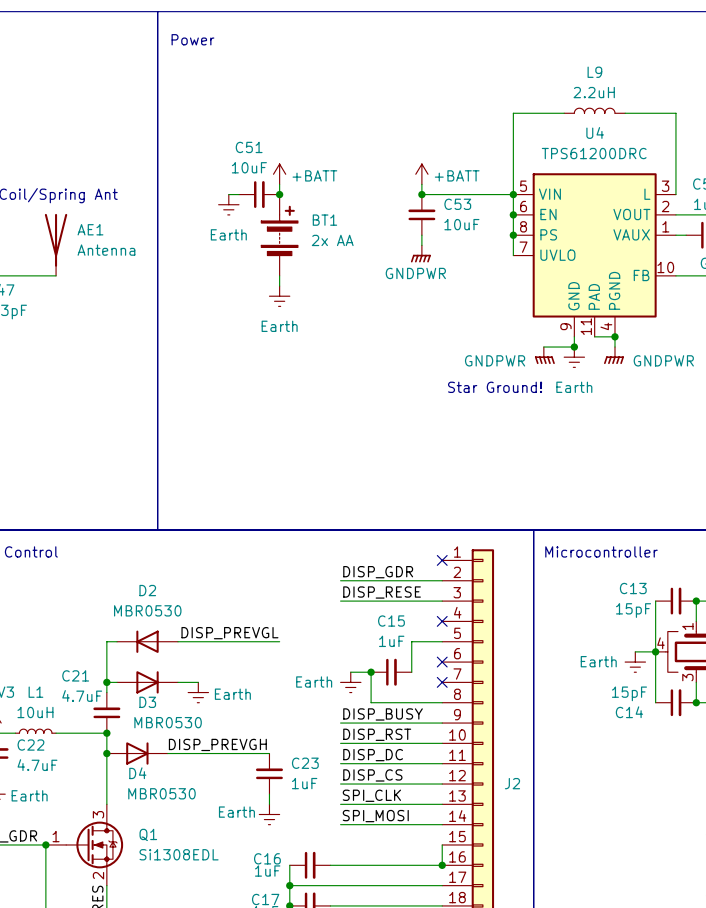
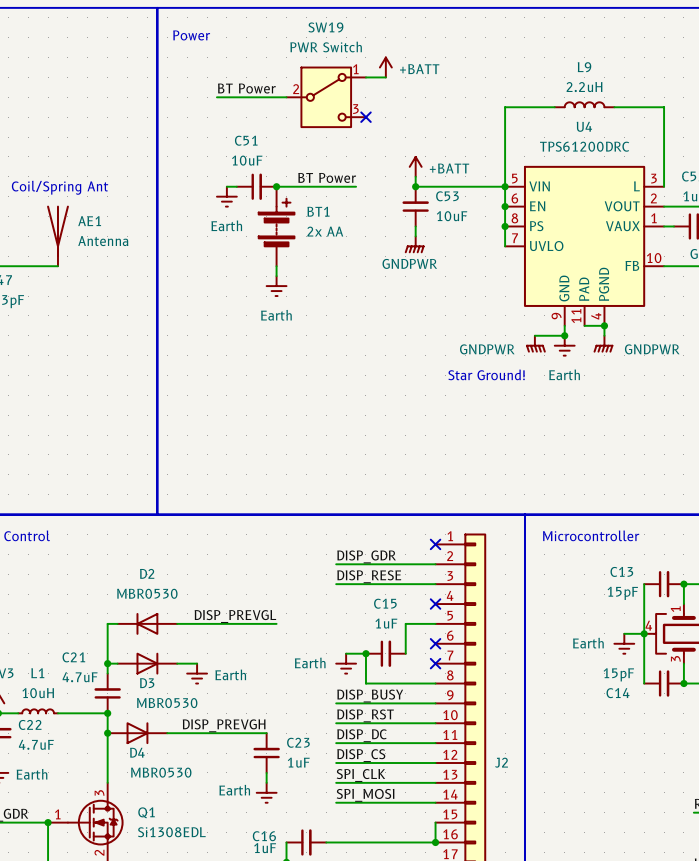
wire: none -> (365, 77) (385, 77)
label: none -> BT Power (246, 88)
wire: none -> (216, 97) (286, 97)
SW19: none -> PWR Switch (326, 97)
no-connect mark: none -> (365, 117)
power symbol position: +BATT (279, 174) -> +BATT (385, 67)
wire: (279, 184) (279, 194) -> (356, 186) (276, 186)
label: none -> BT Power (327, 177)

